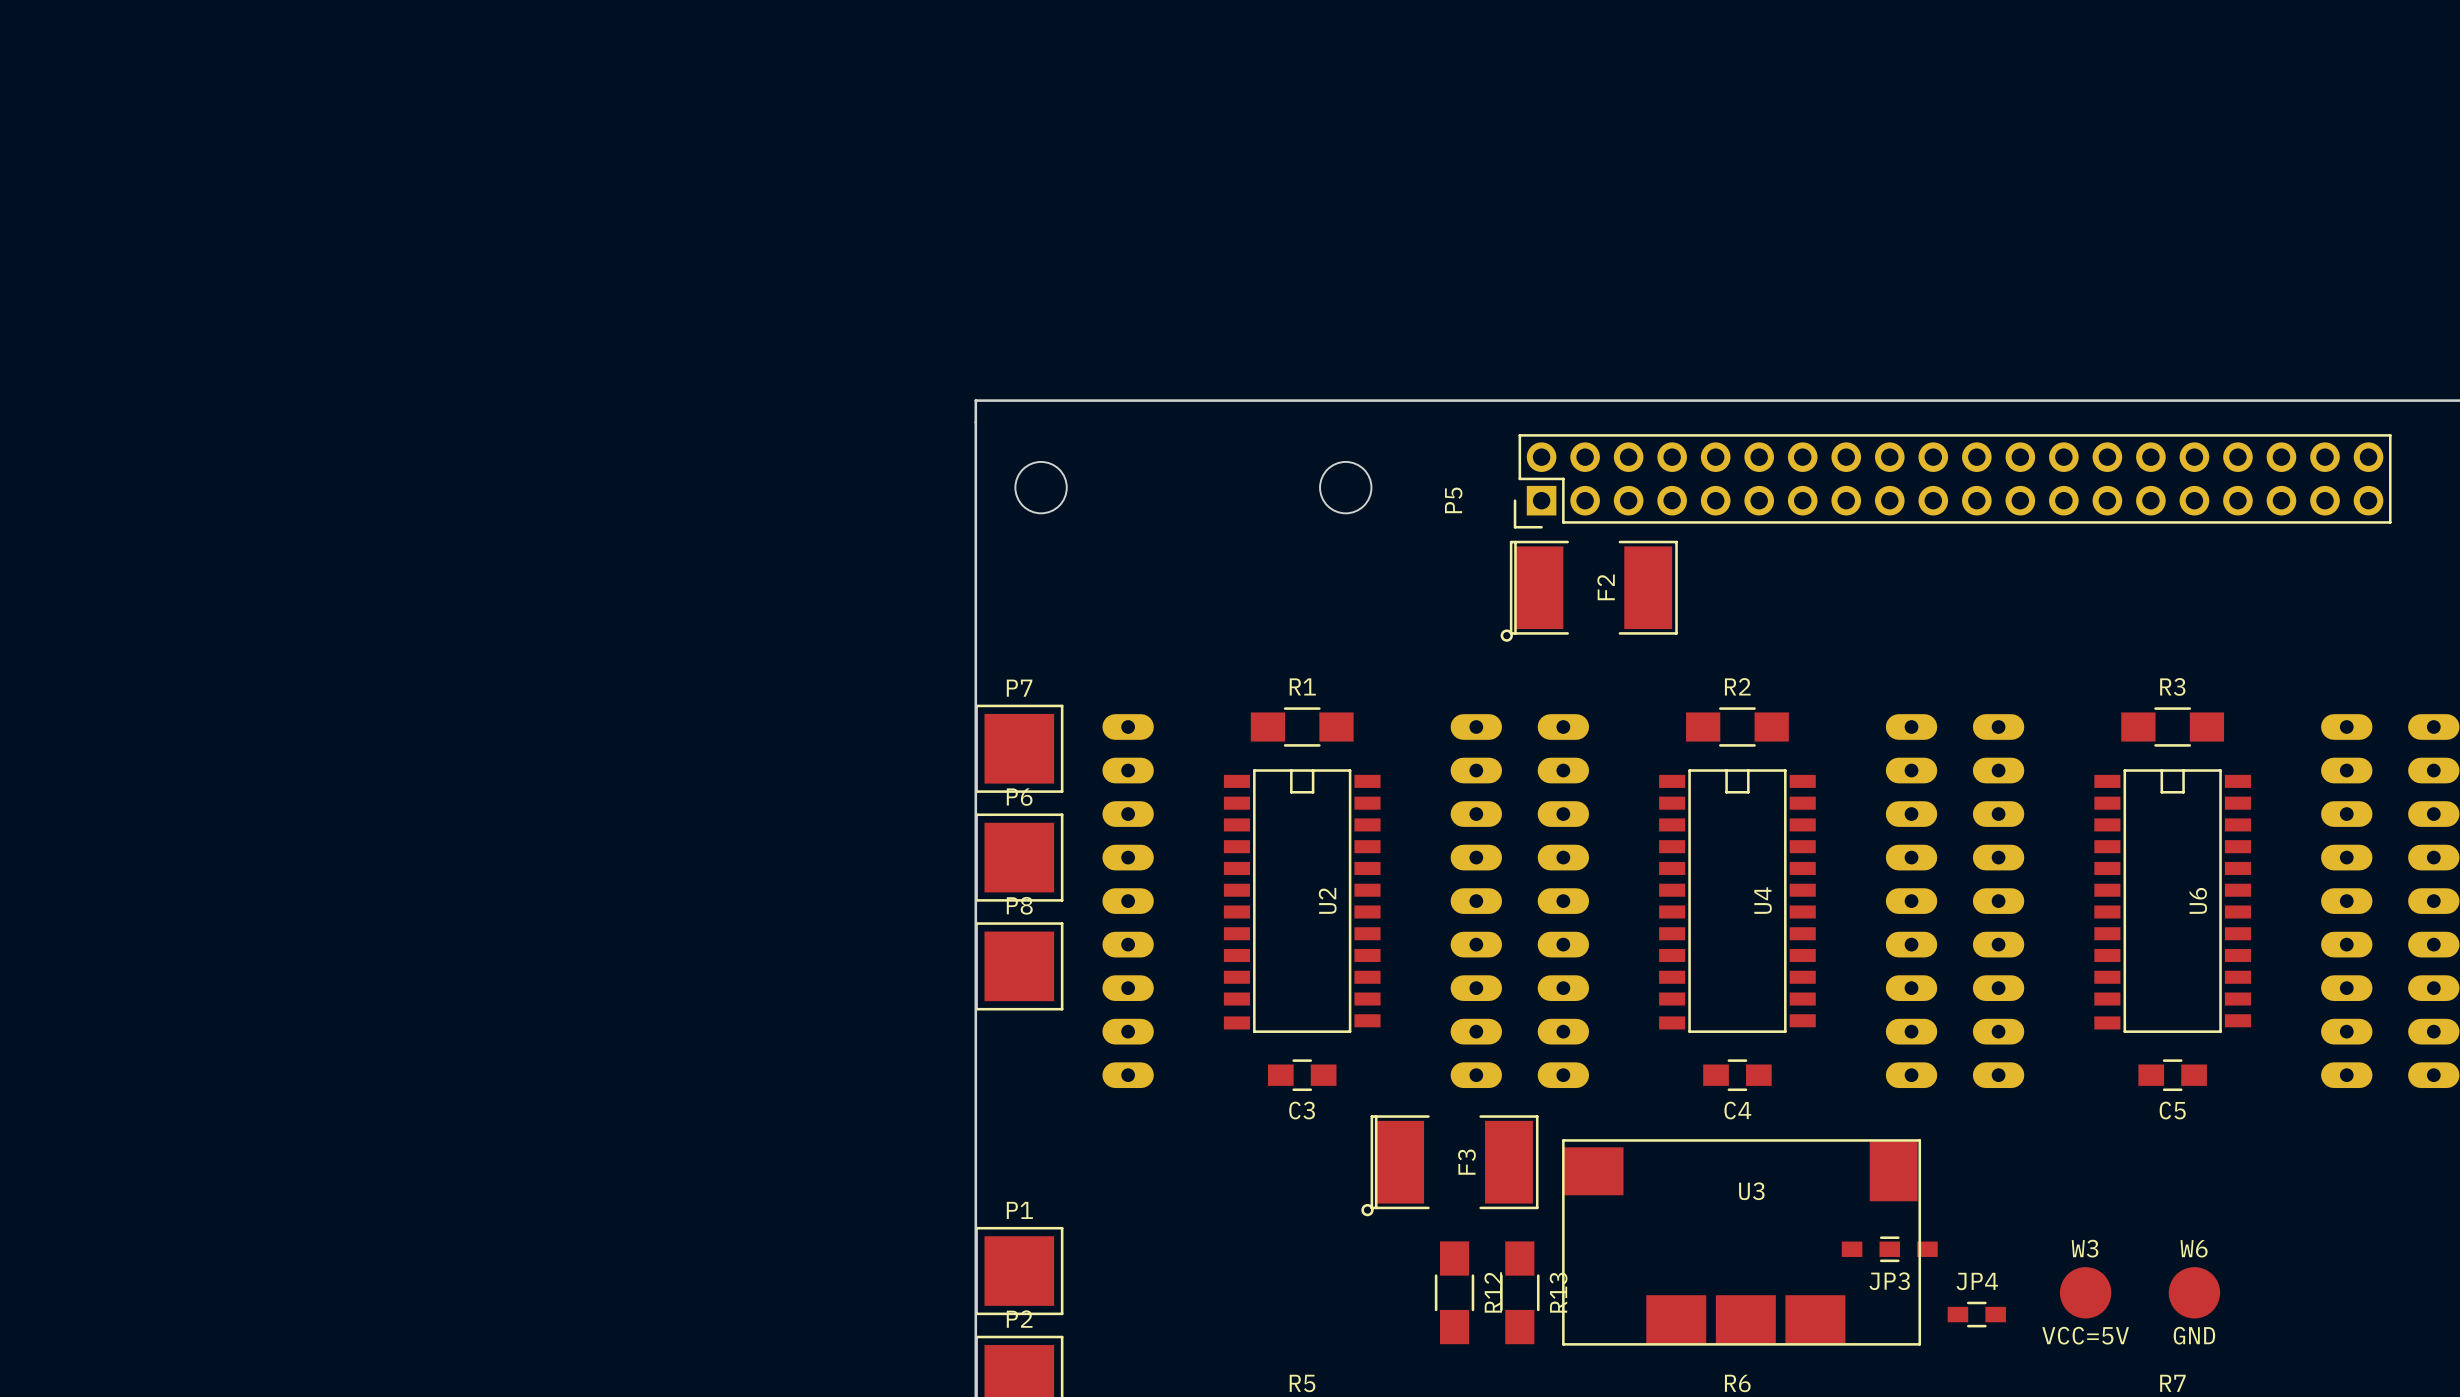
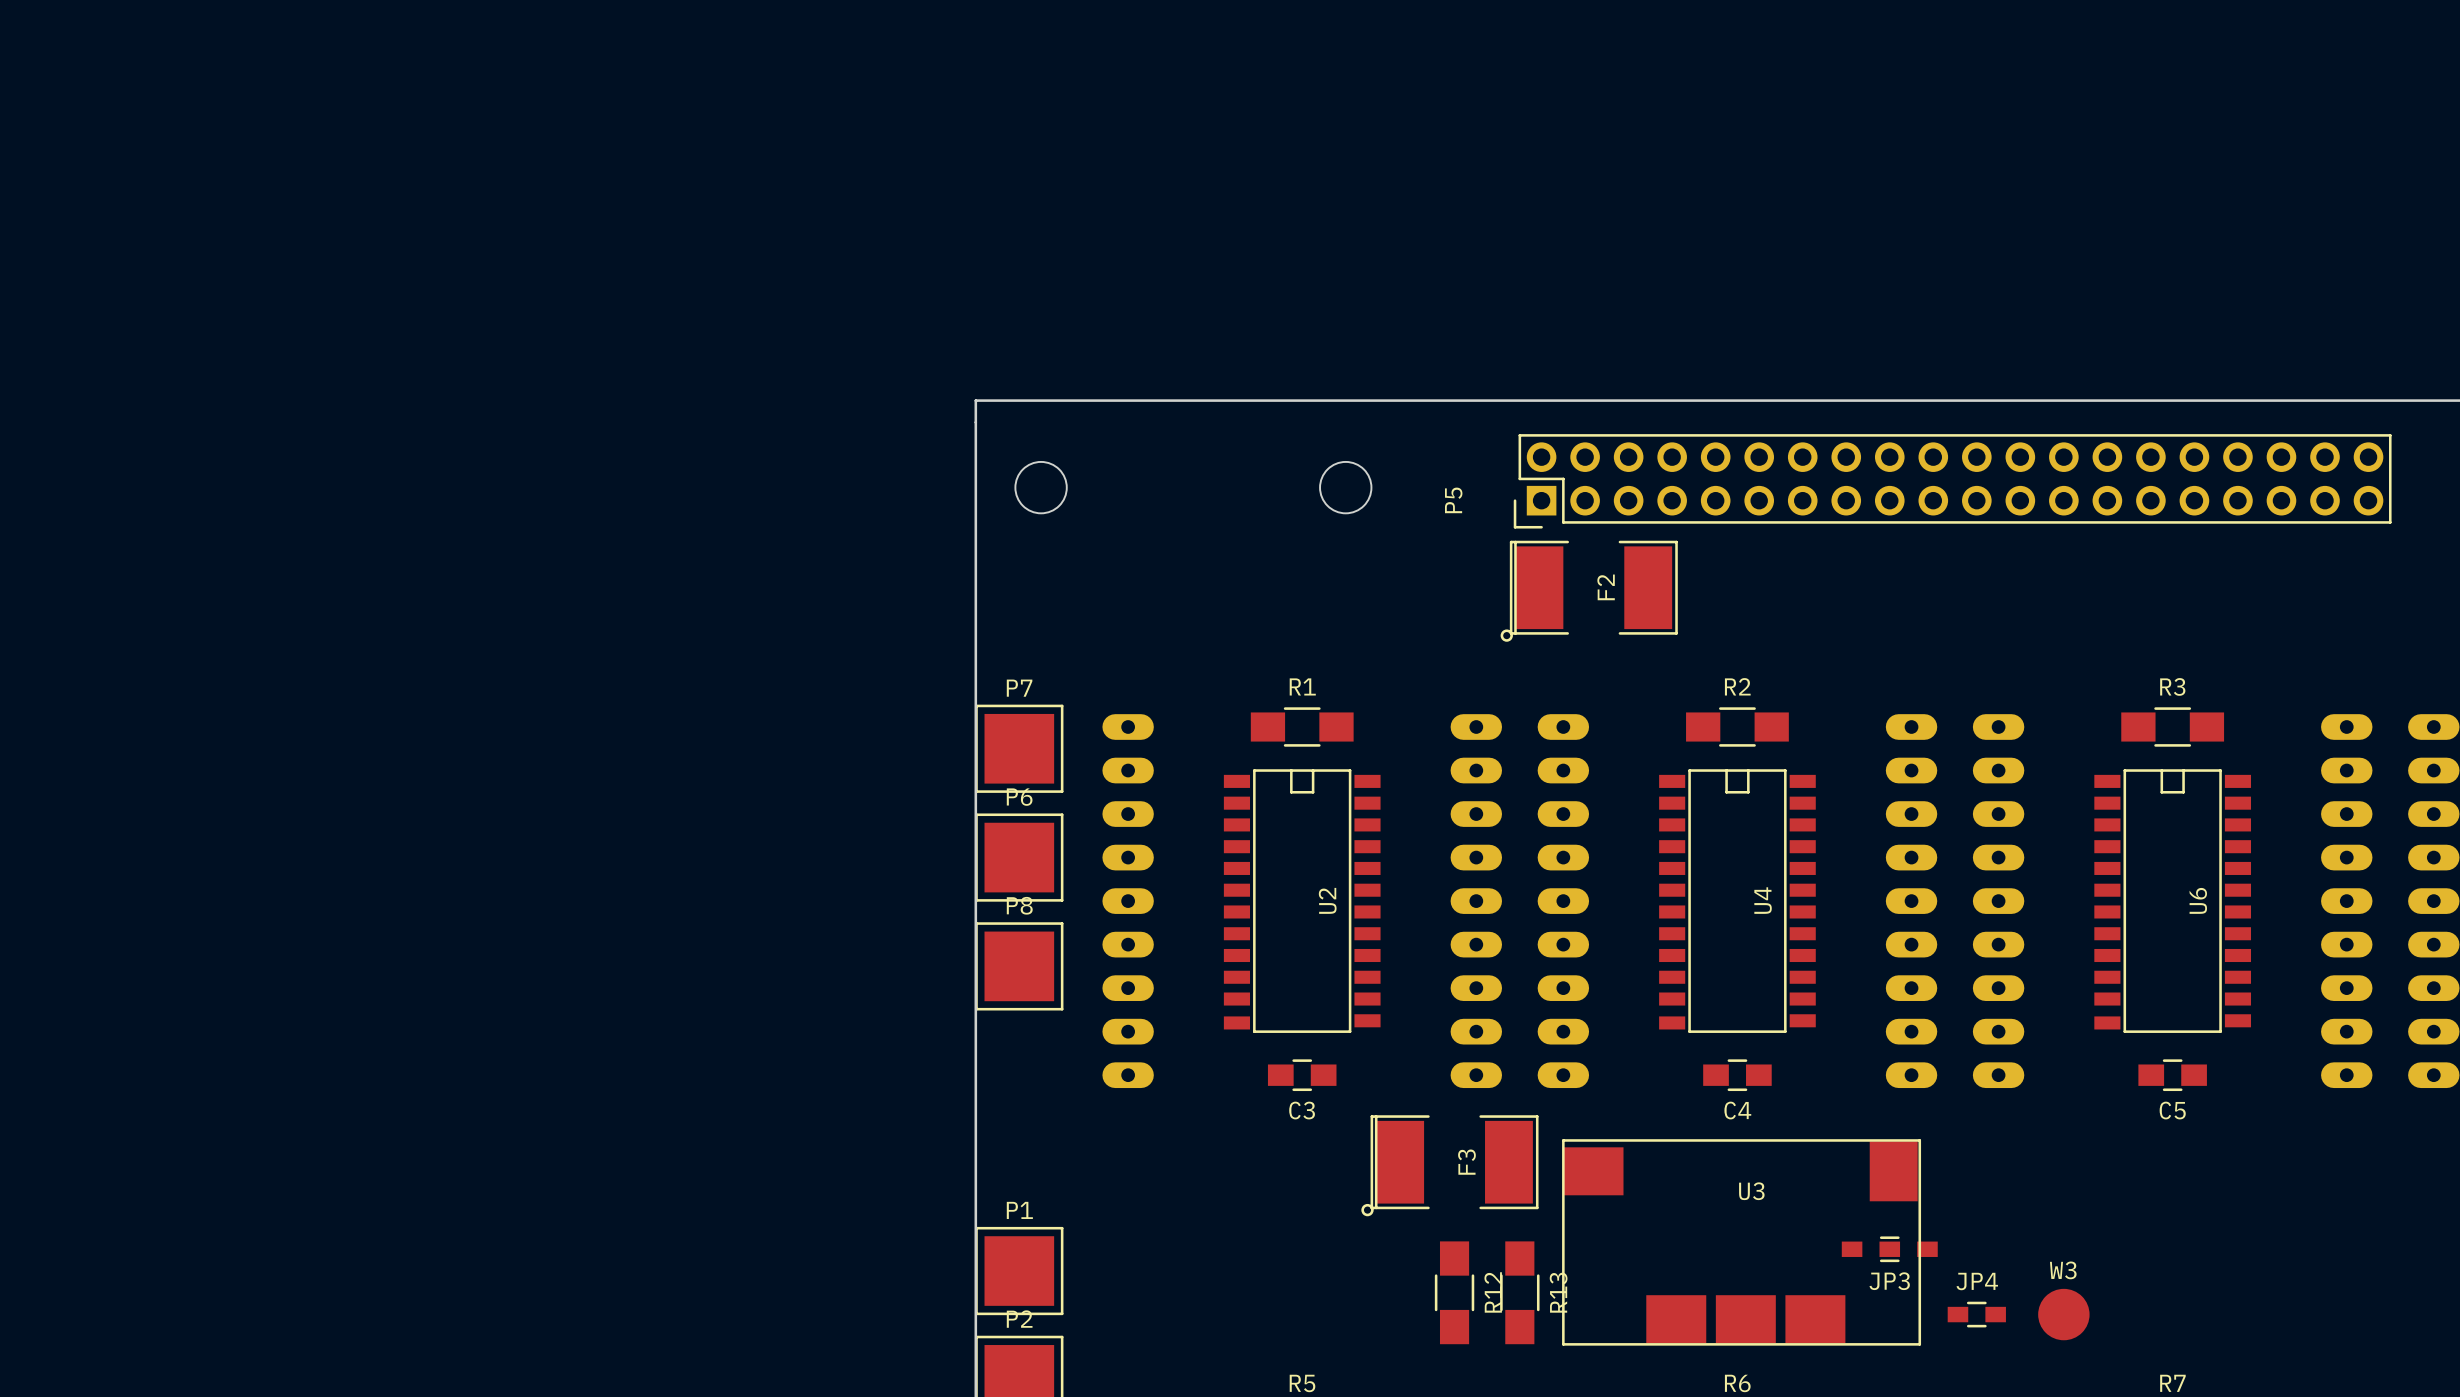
W3 position: (2085, 1292) -> (2063, 1314)
W6: GND (2194, 1292) -> none
W3 value: VCC=5V (2085, 1335) -> none

